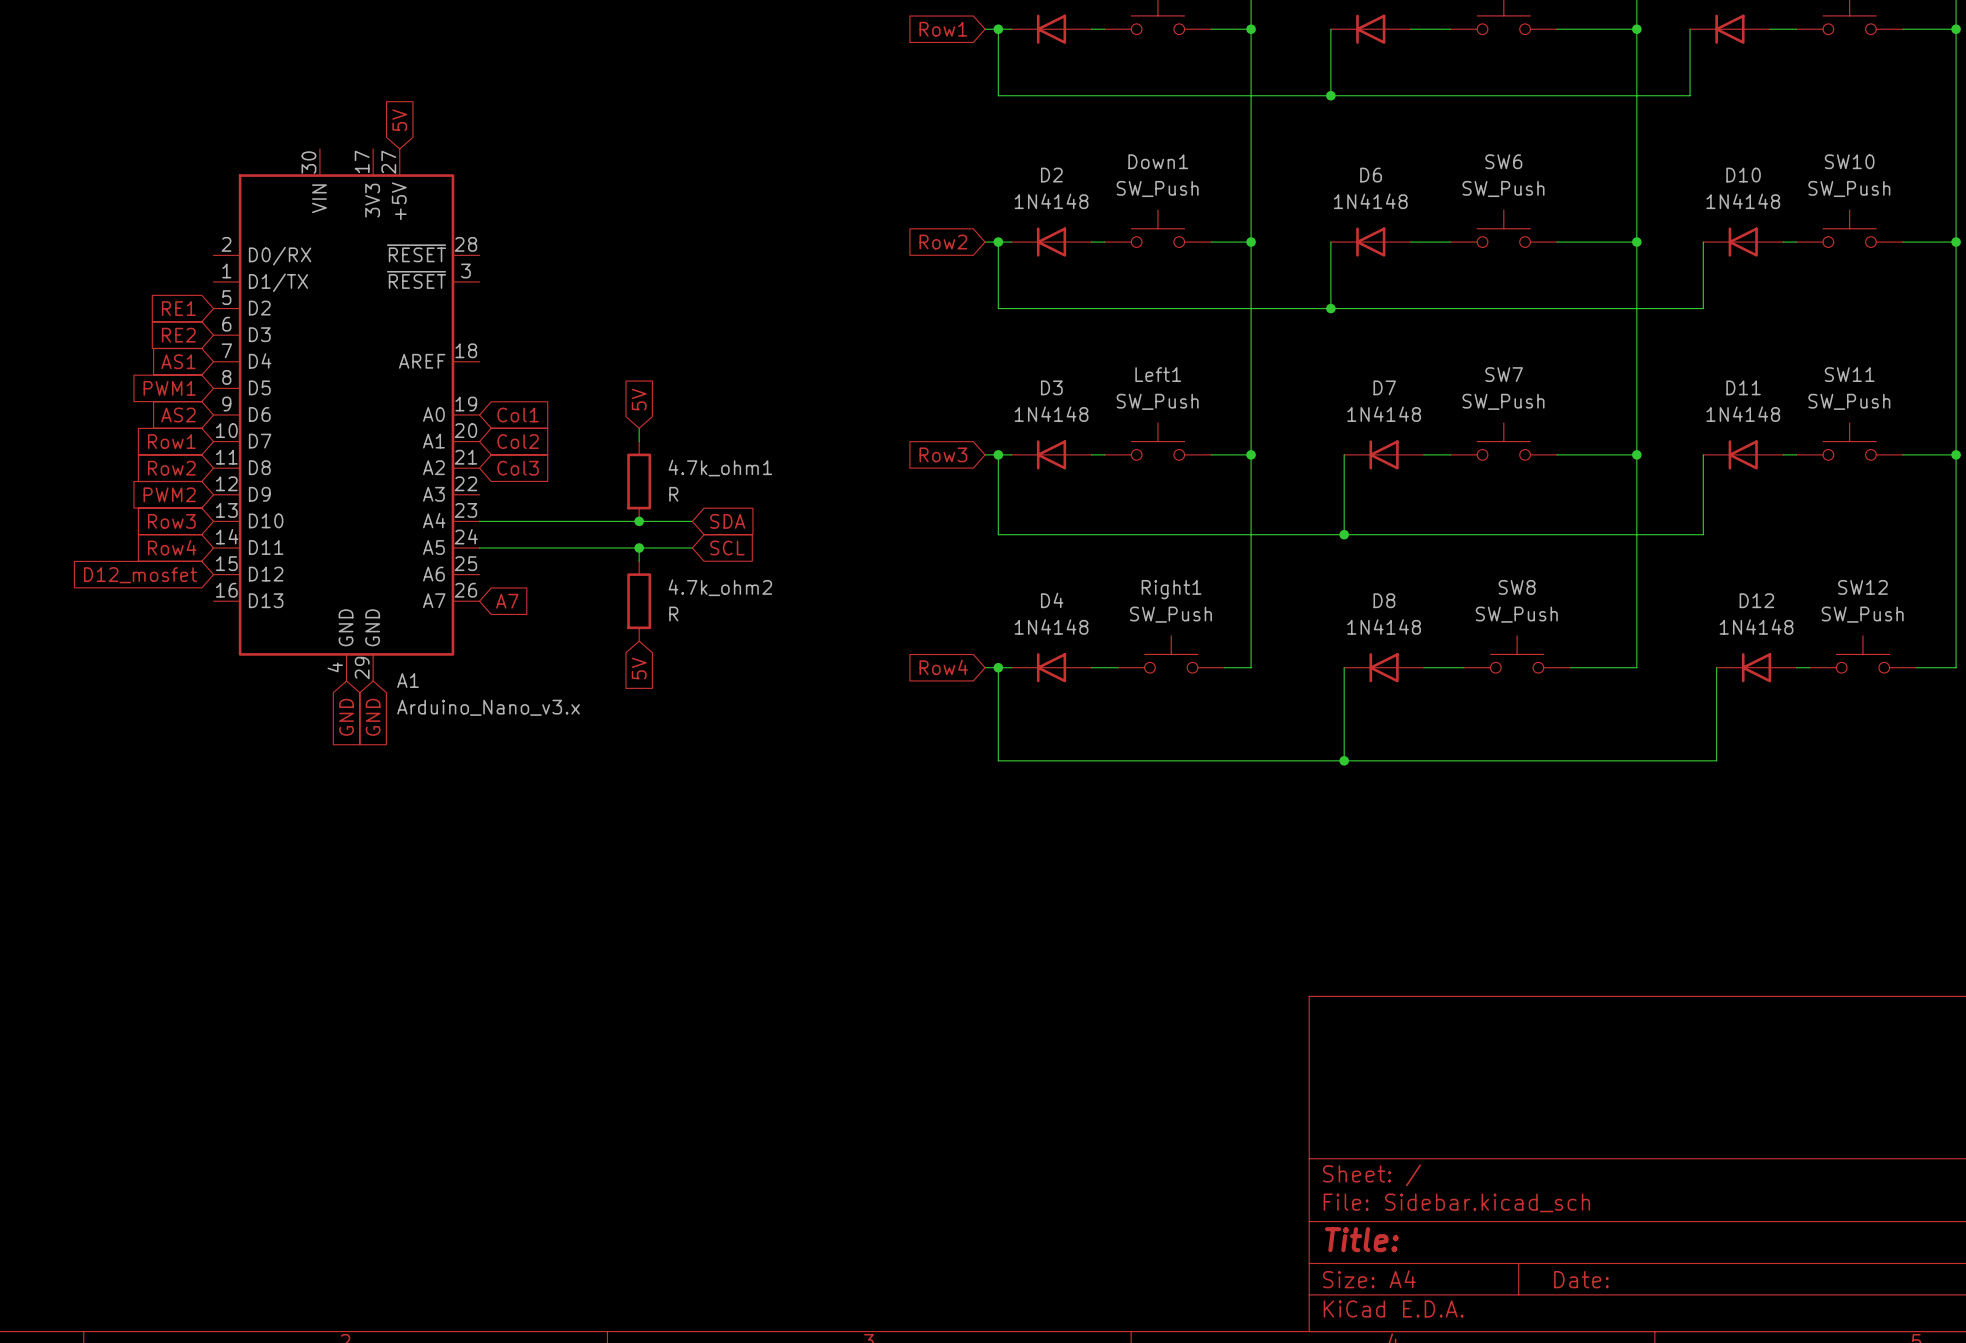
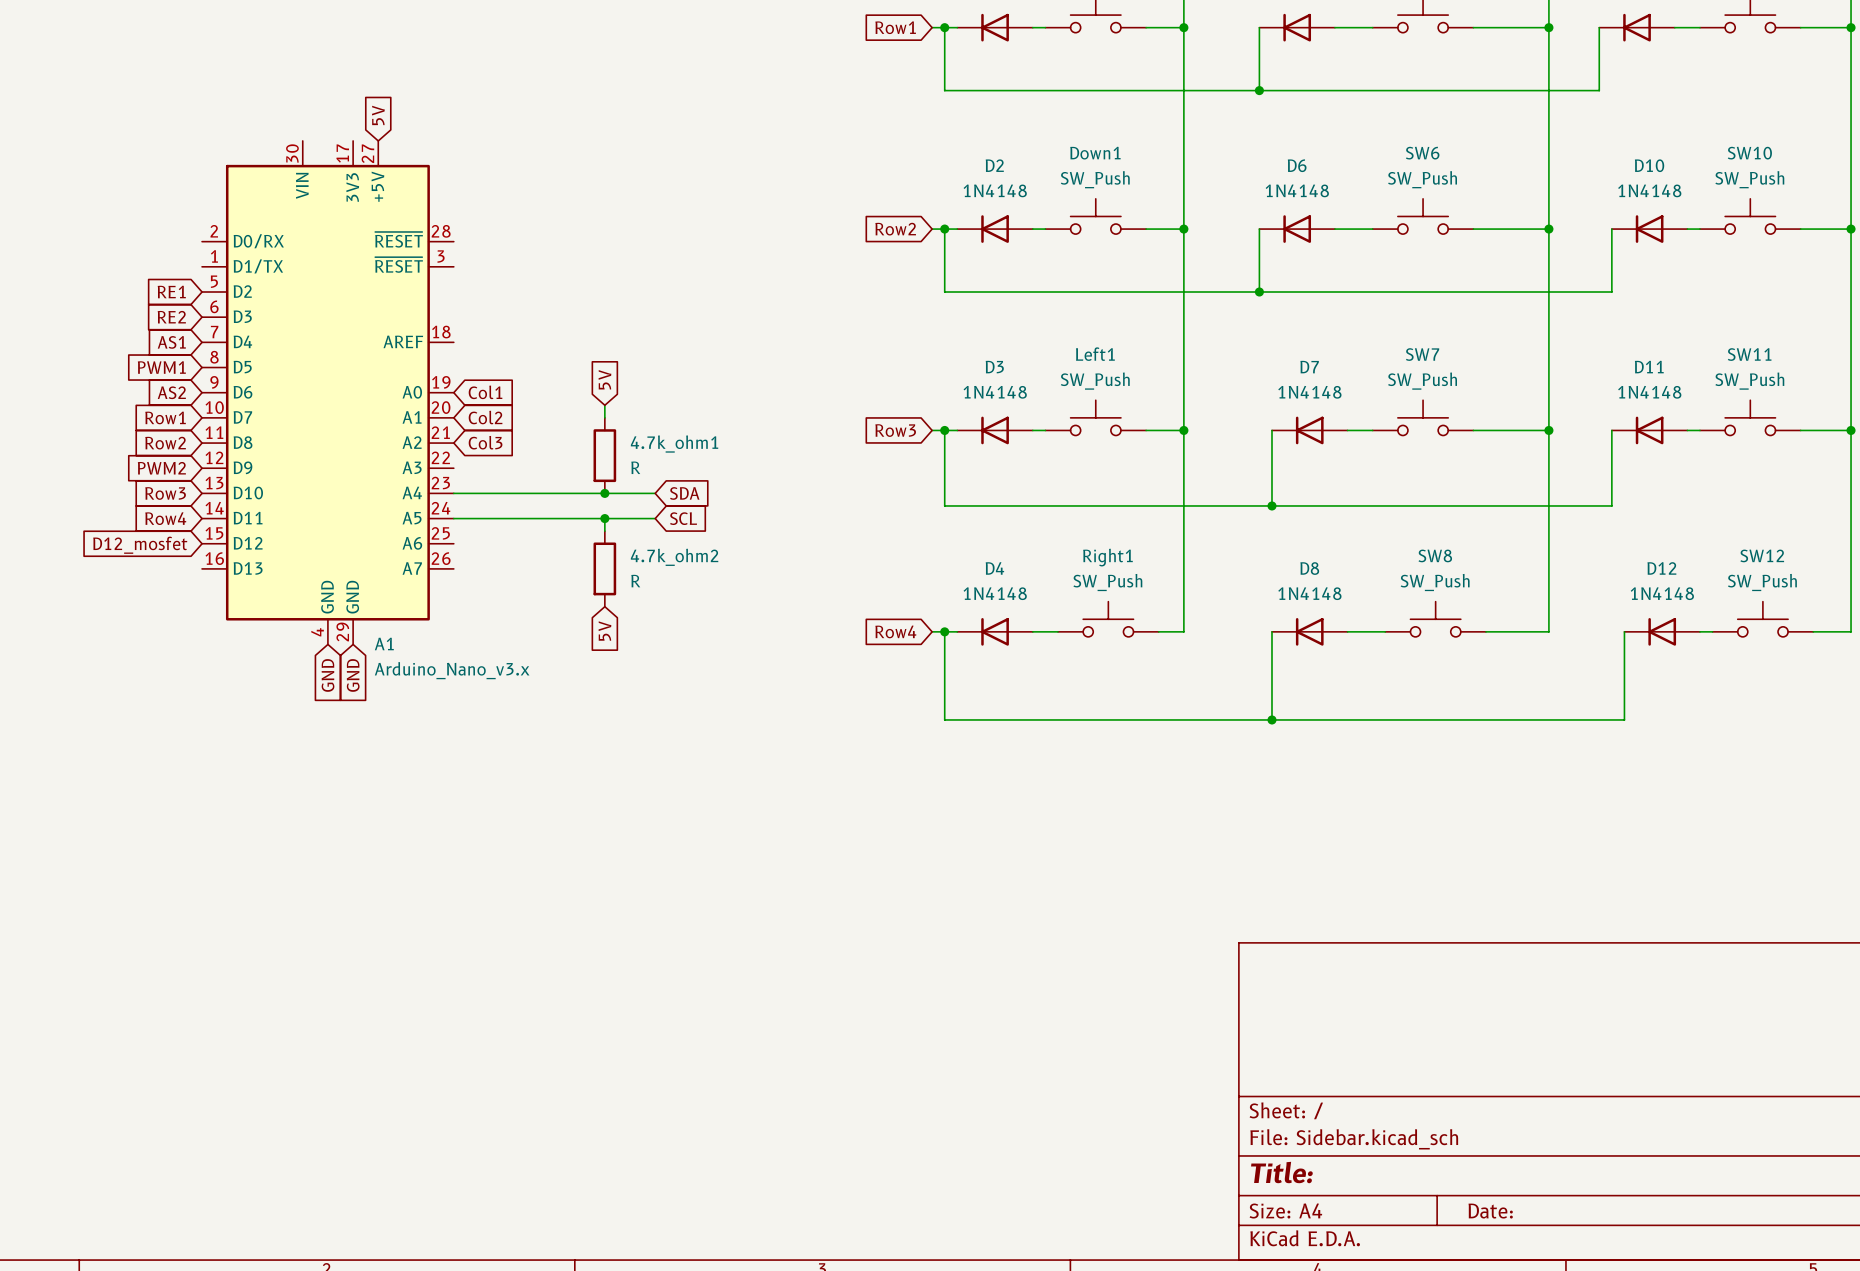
global label: A7 (507, 601) -> none

